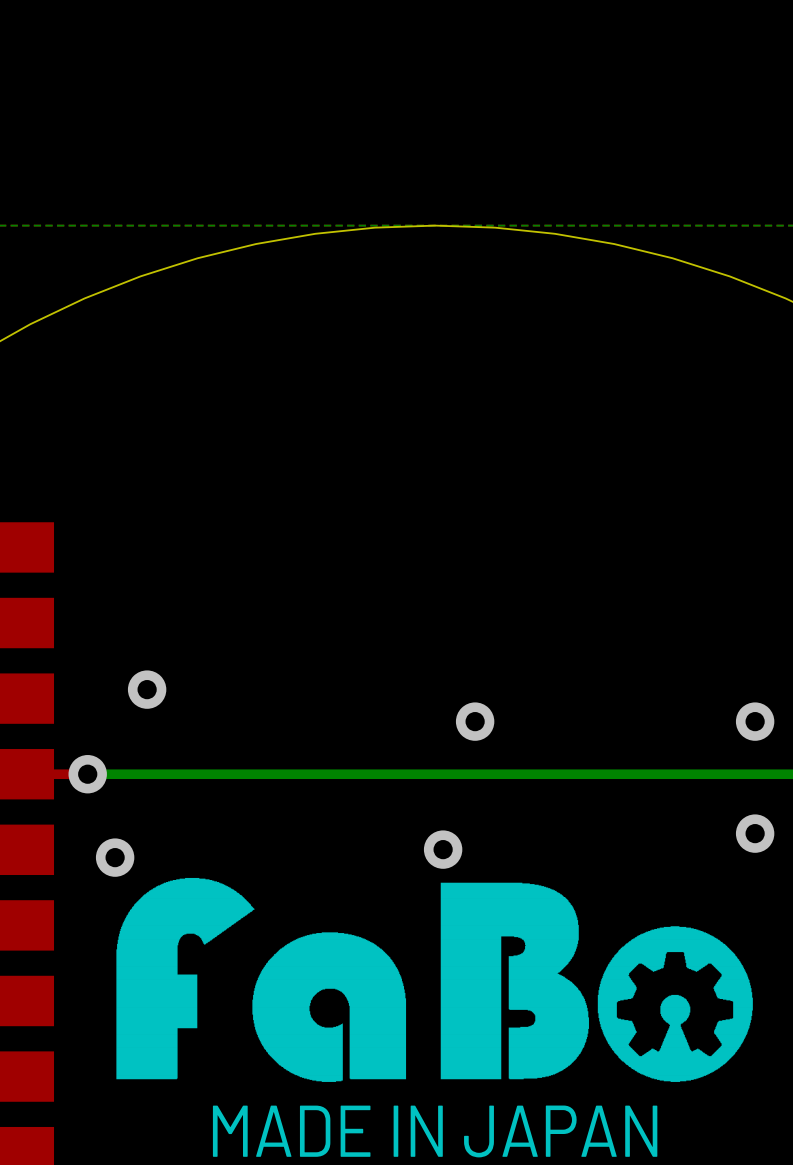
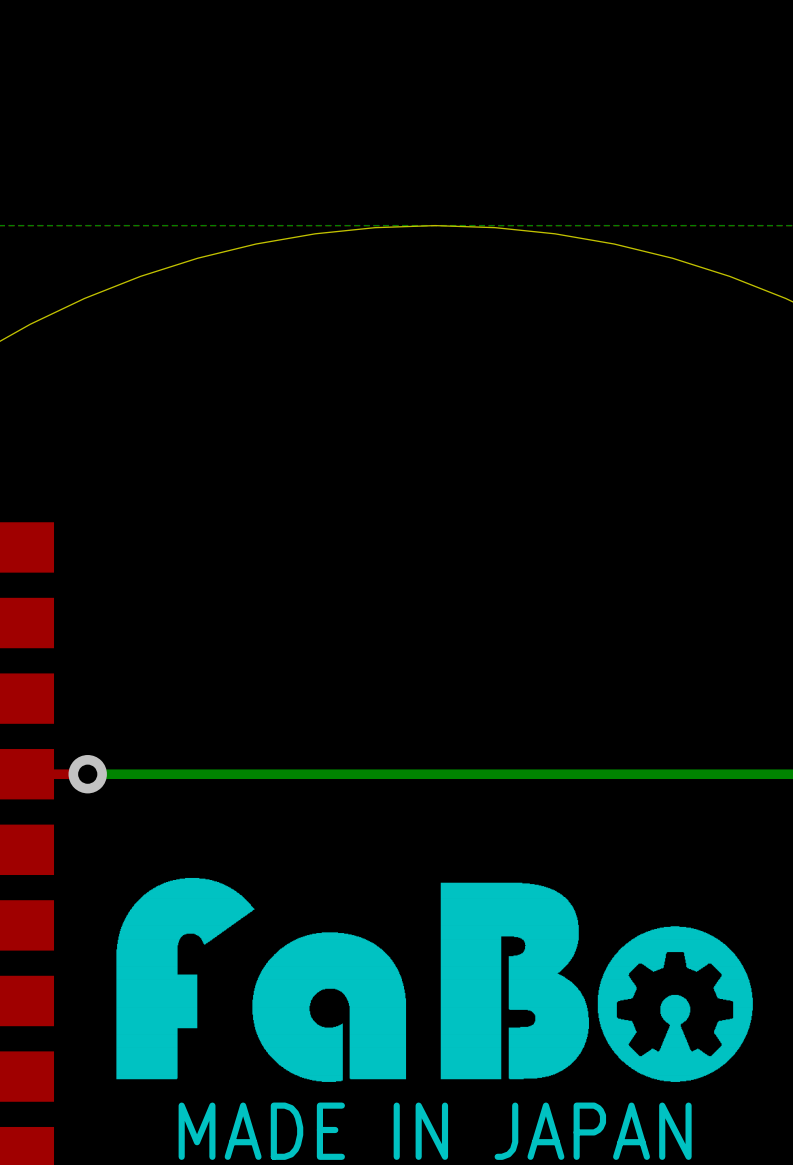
via: (147, 689) -> none
via: (475, 721) -> none
via: (755, 721) -> none
via: (755, 833) -> none
via: (443, 849) -> none
via: (115, 857) -> none

